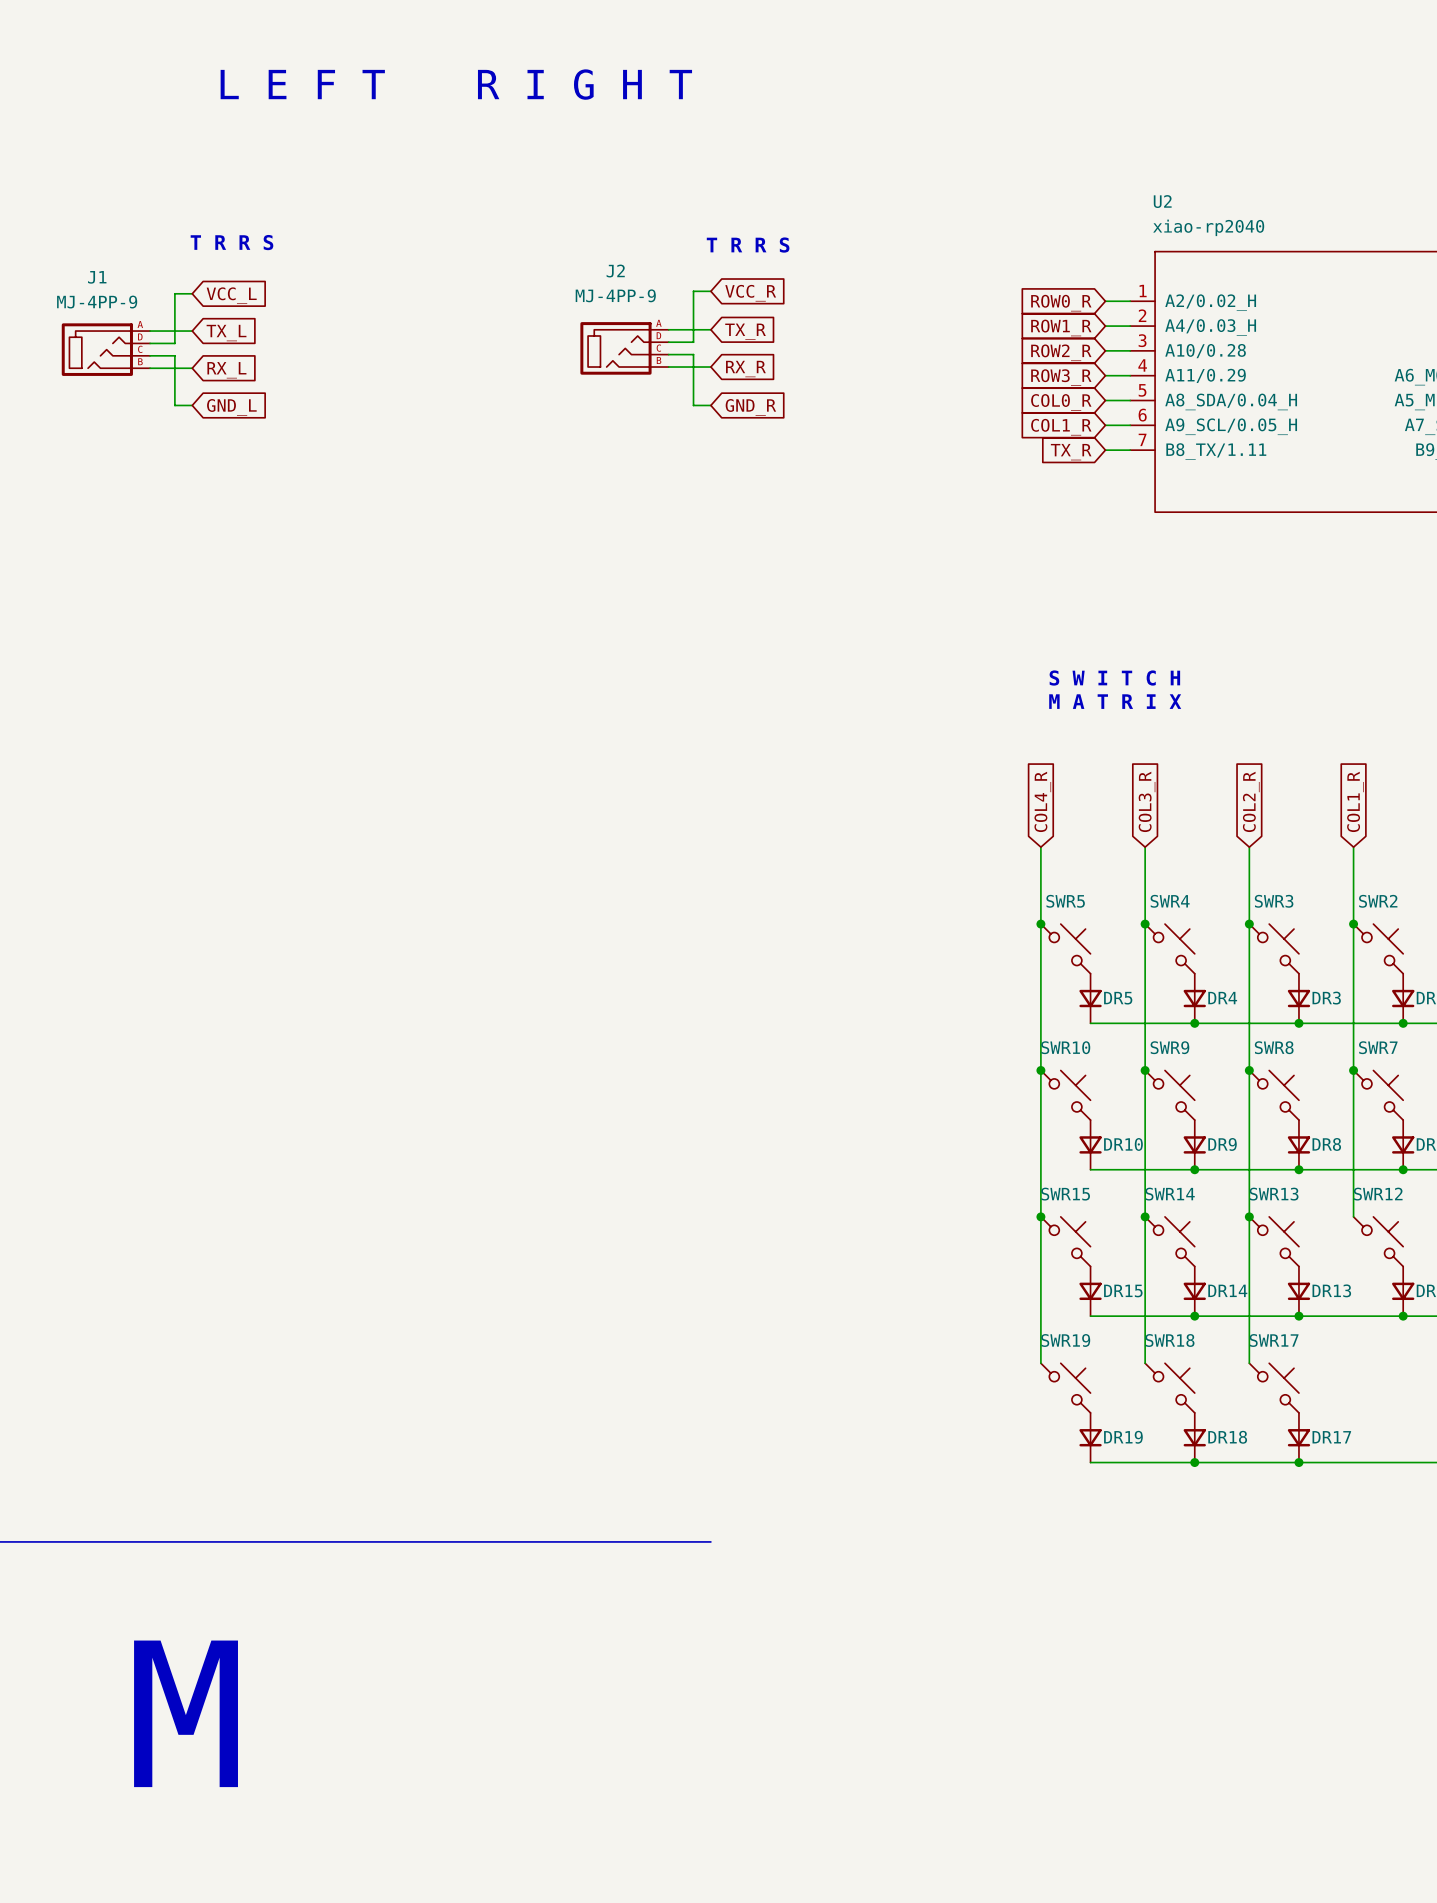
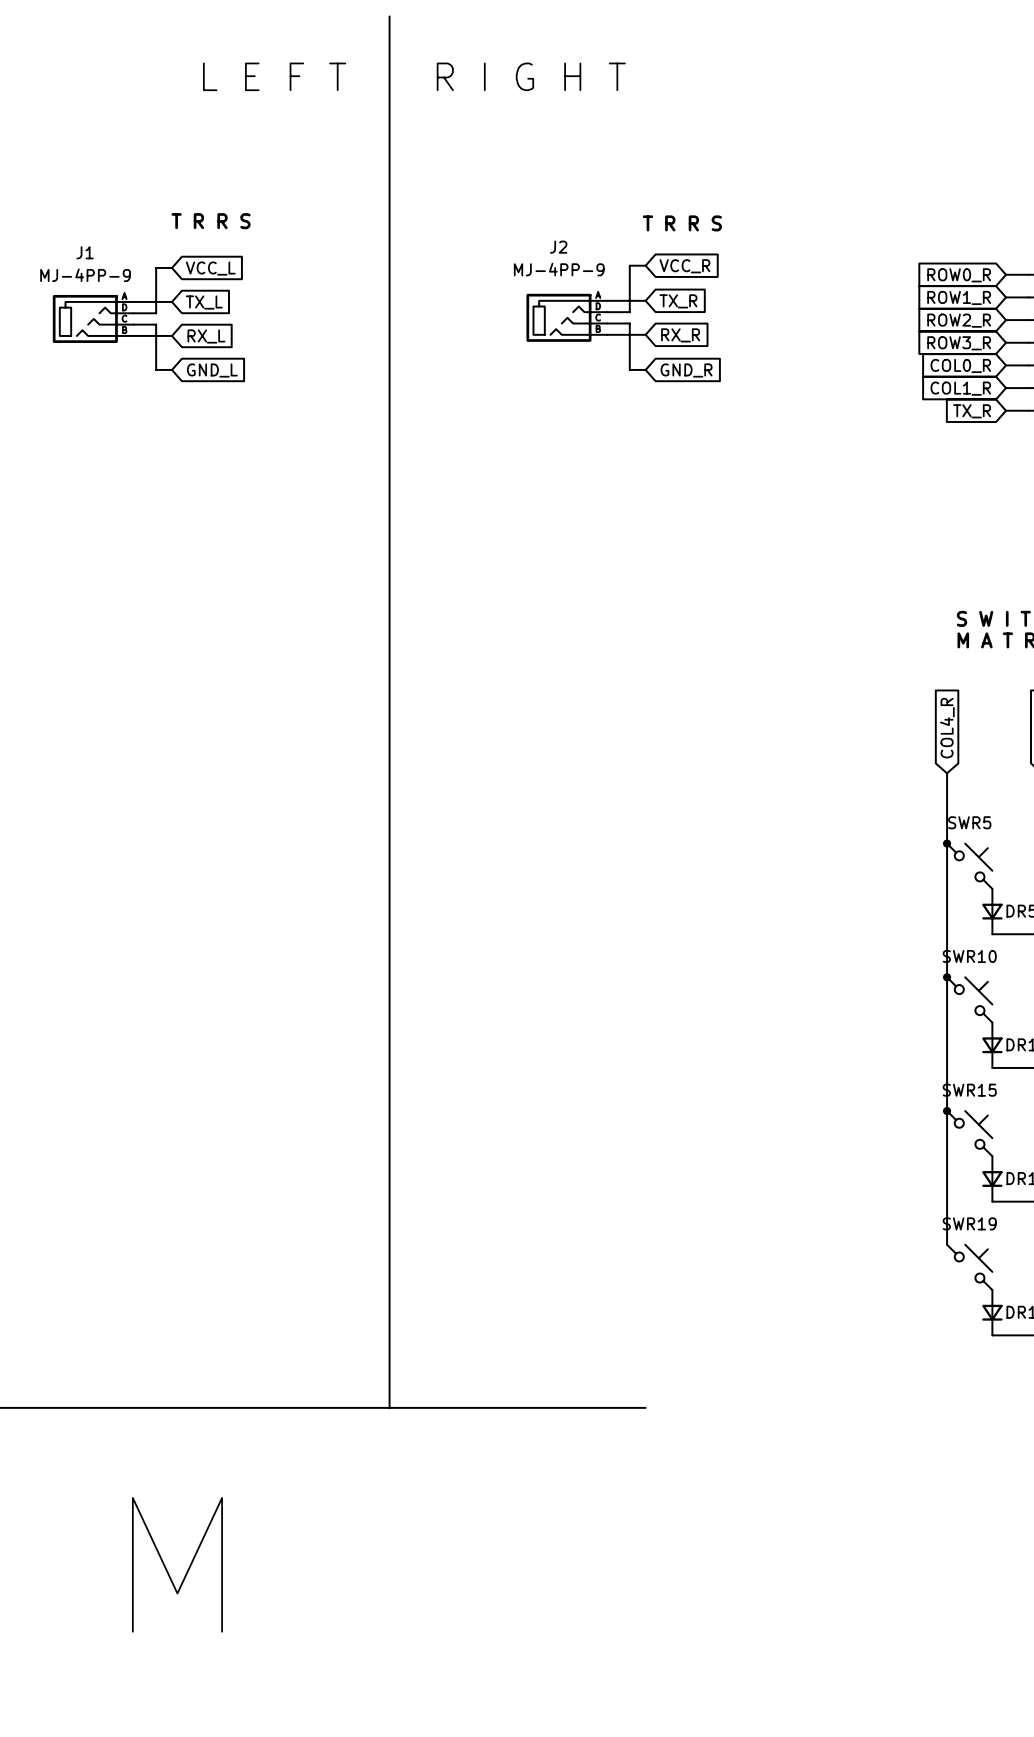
line: none -> (389, 16) (389, 1407)

